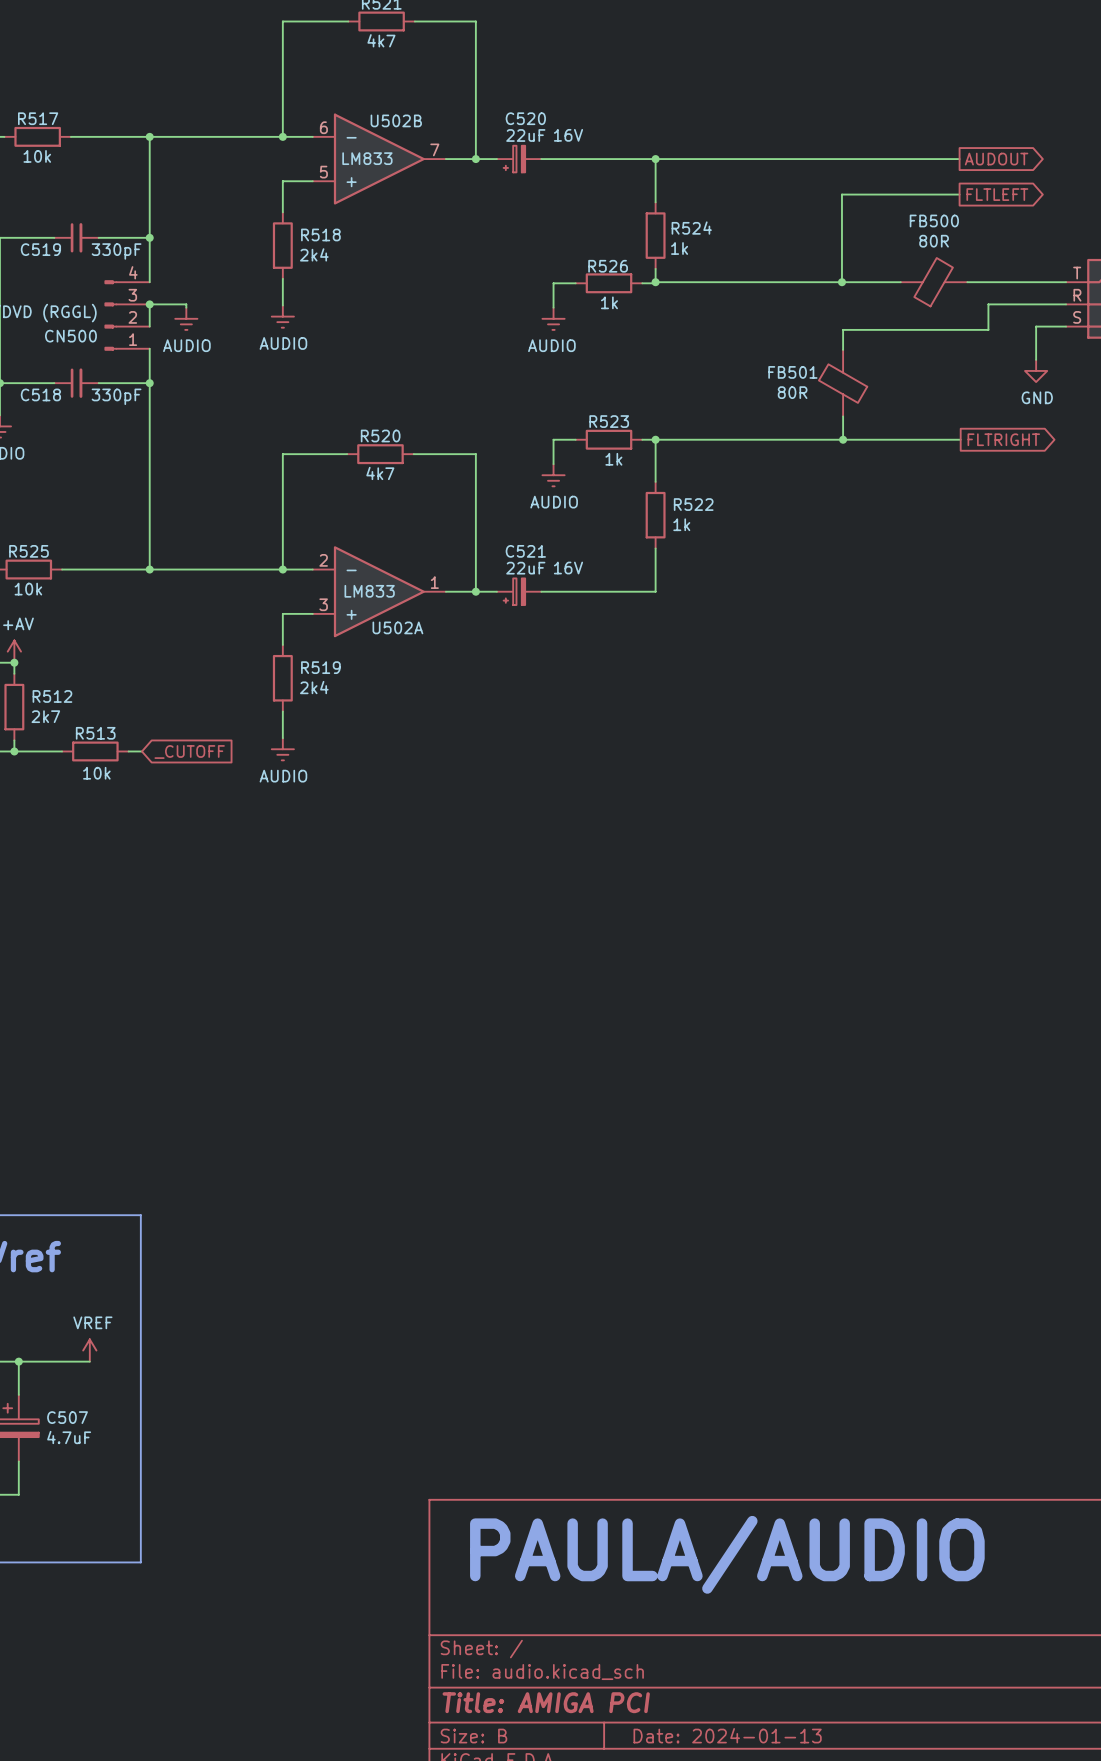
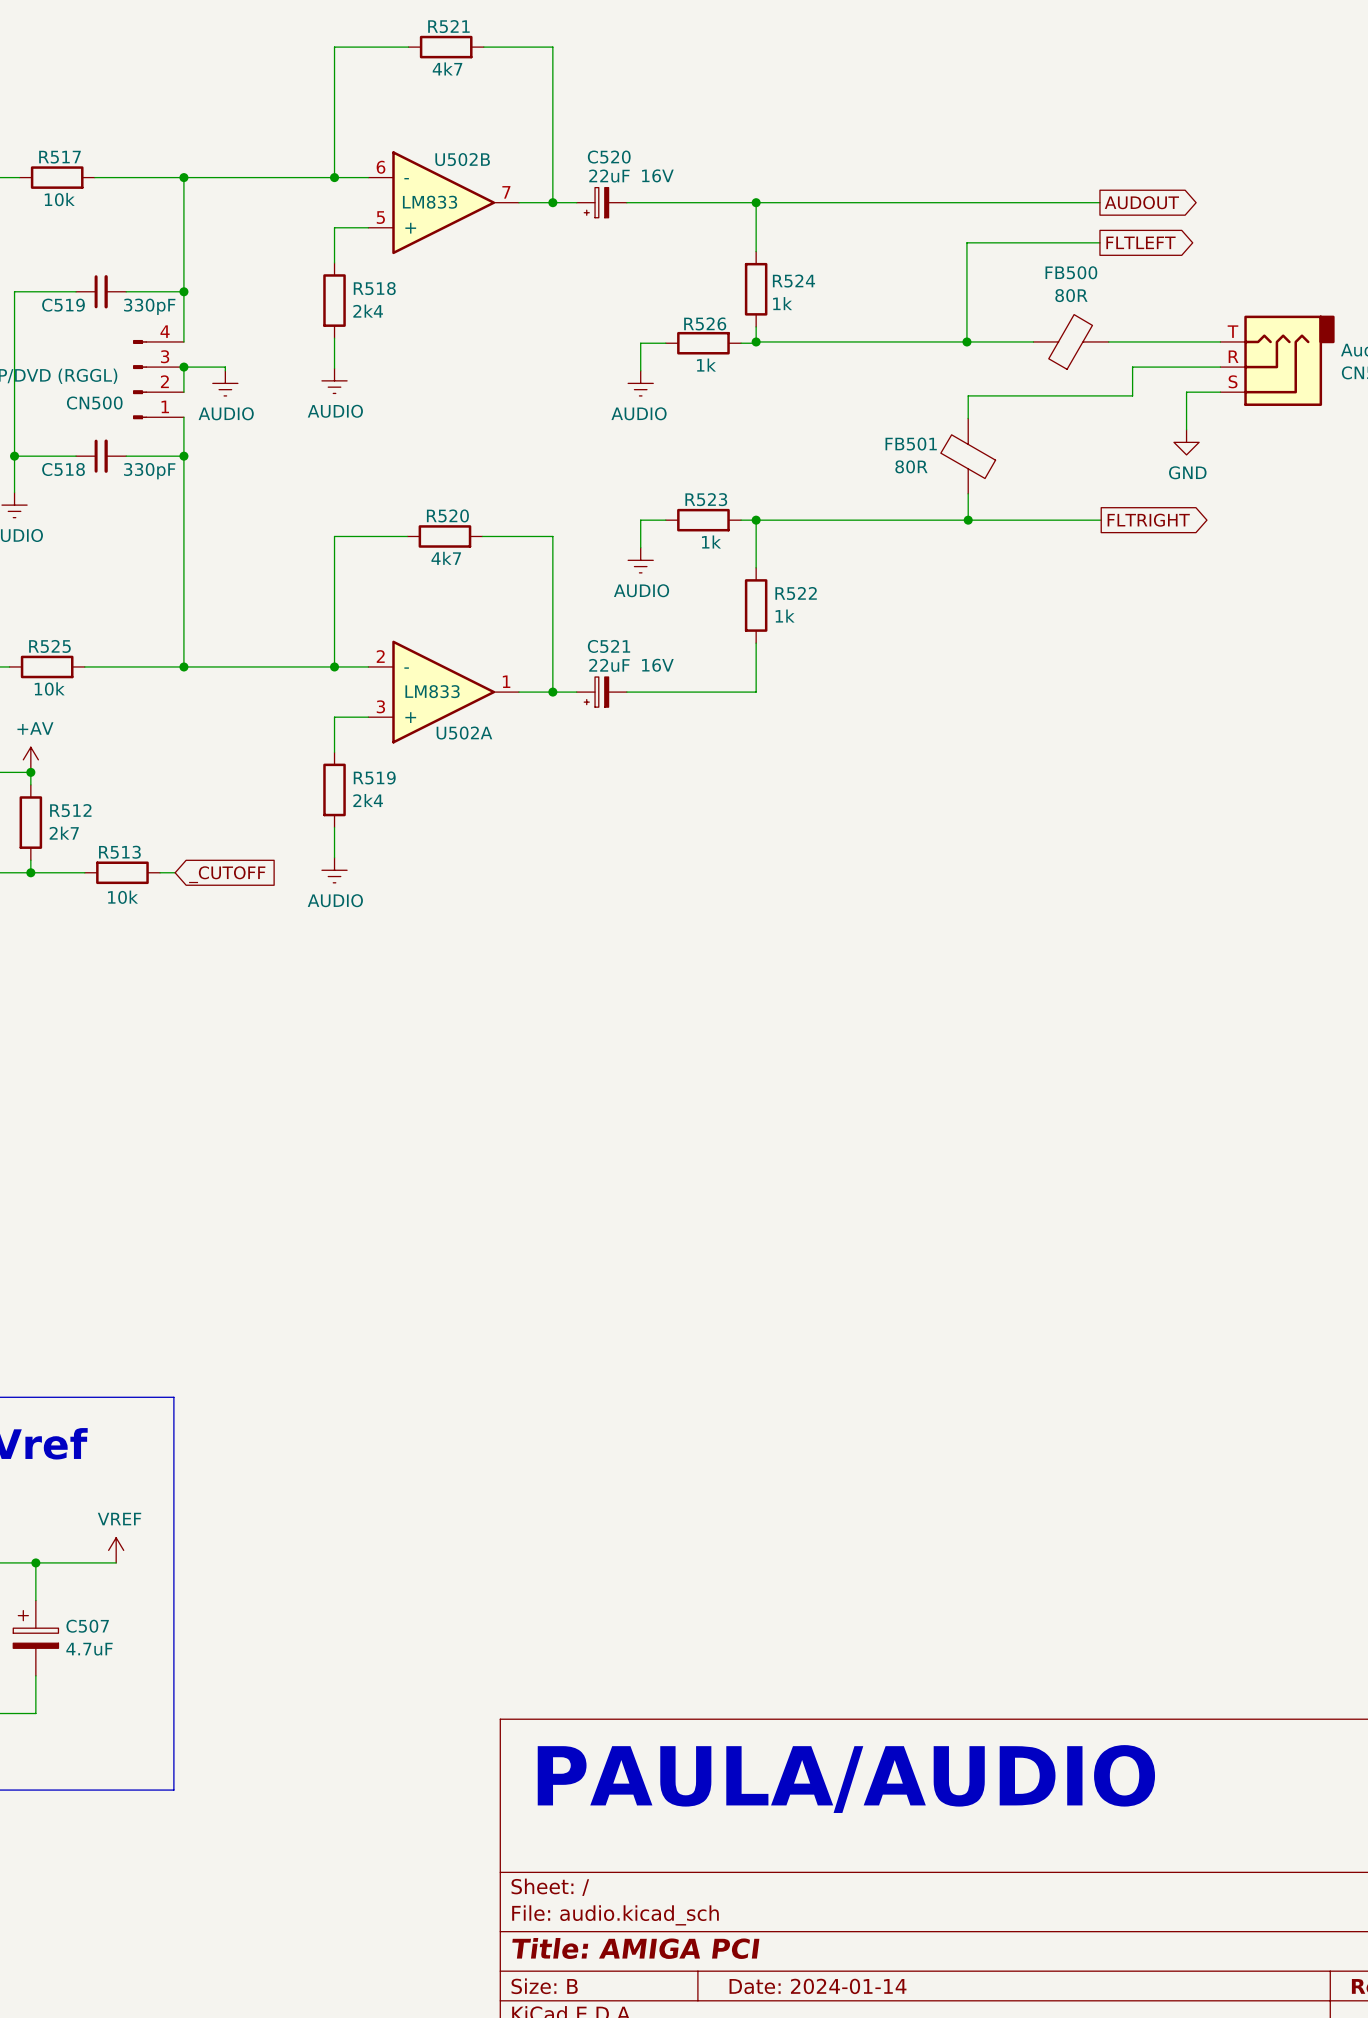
title block: Date: 2024-01-13 (727, 1735) -> Date: 2024-01-14 (818, 1986)

